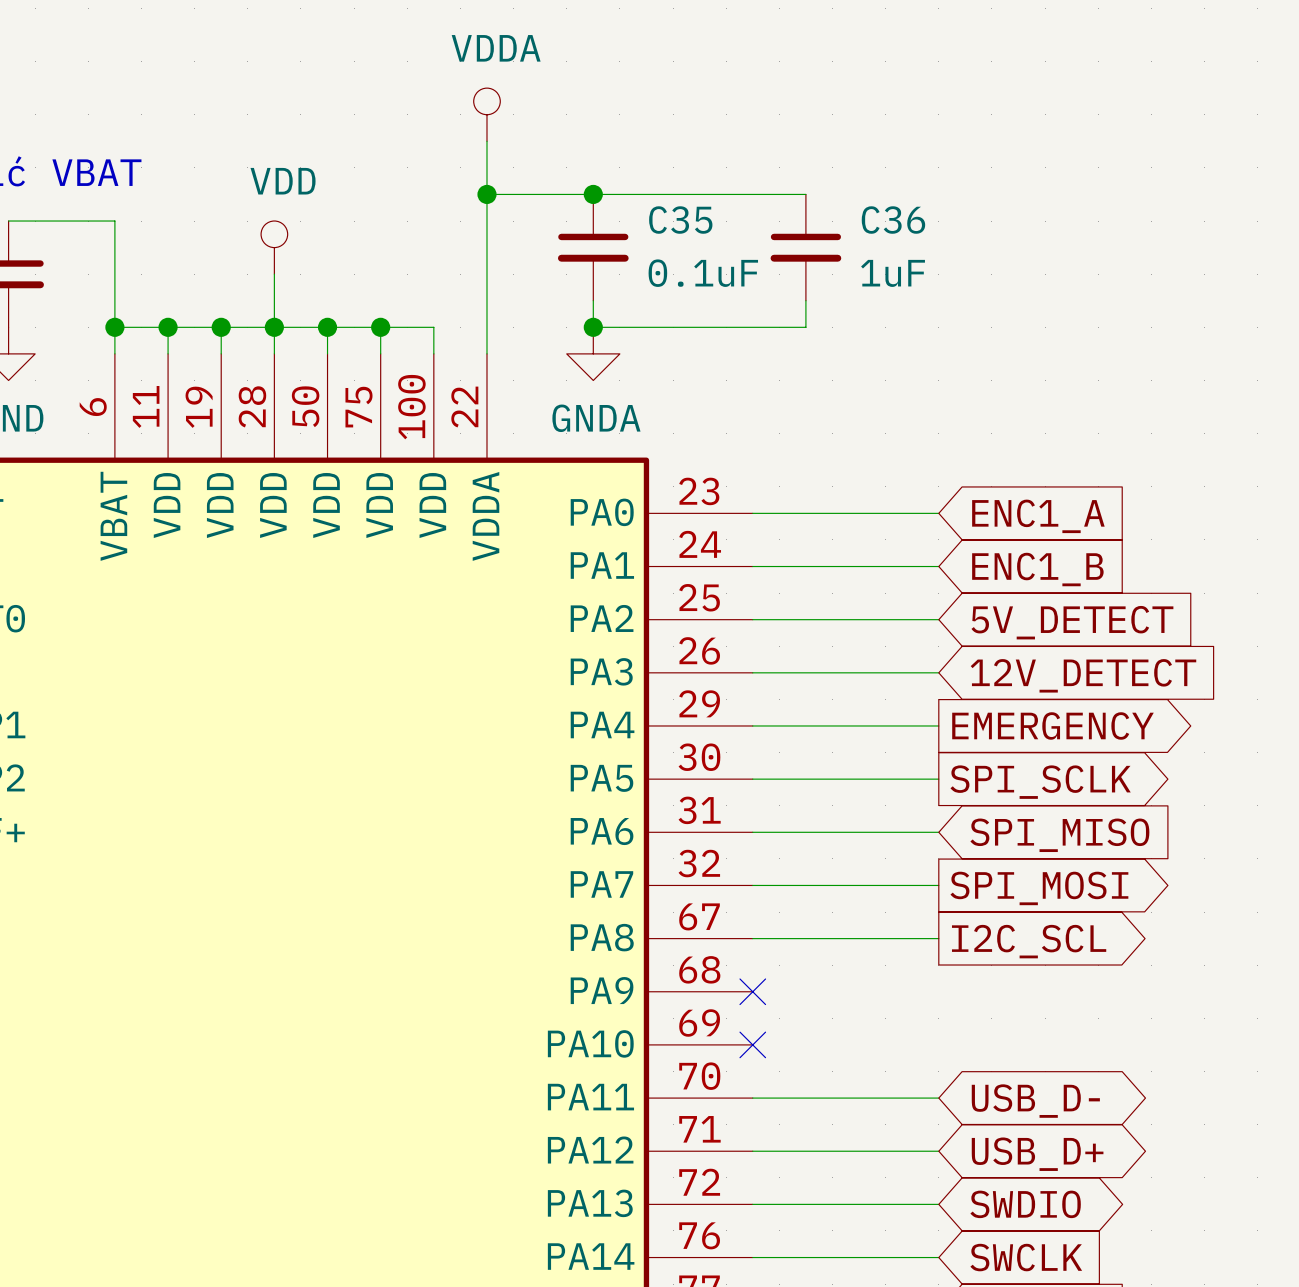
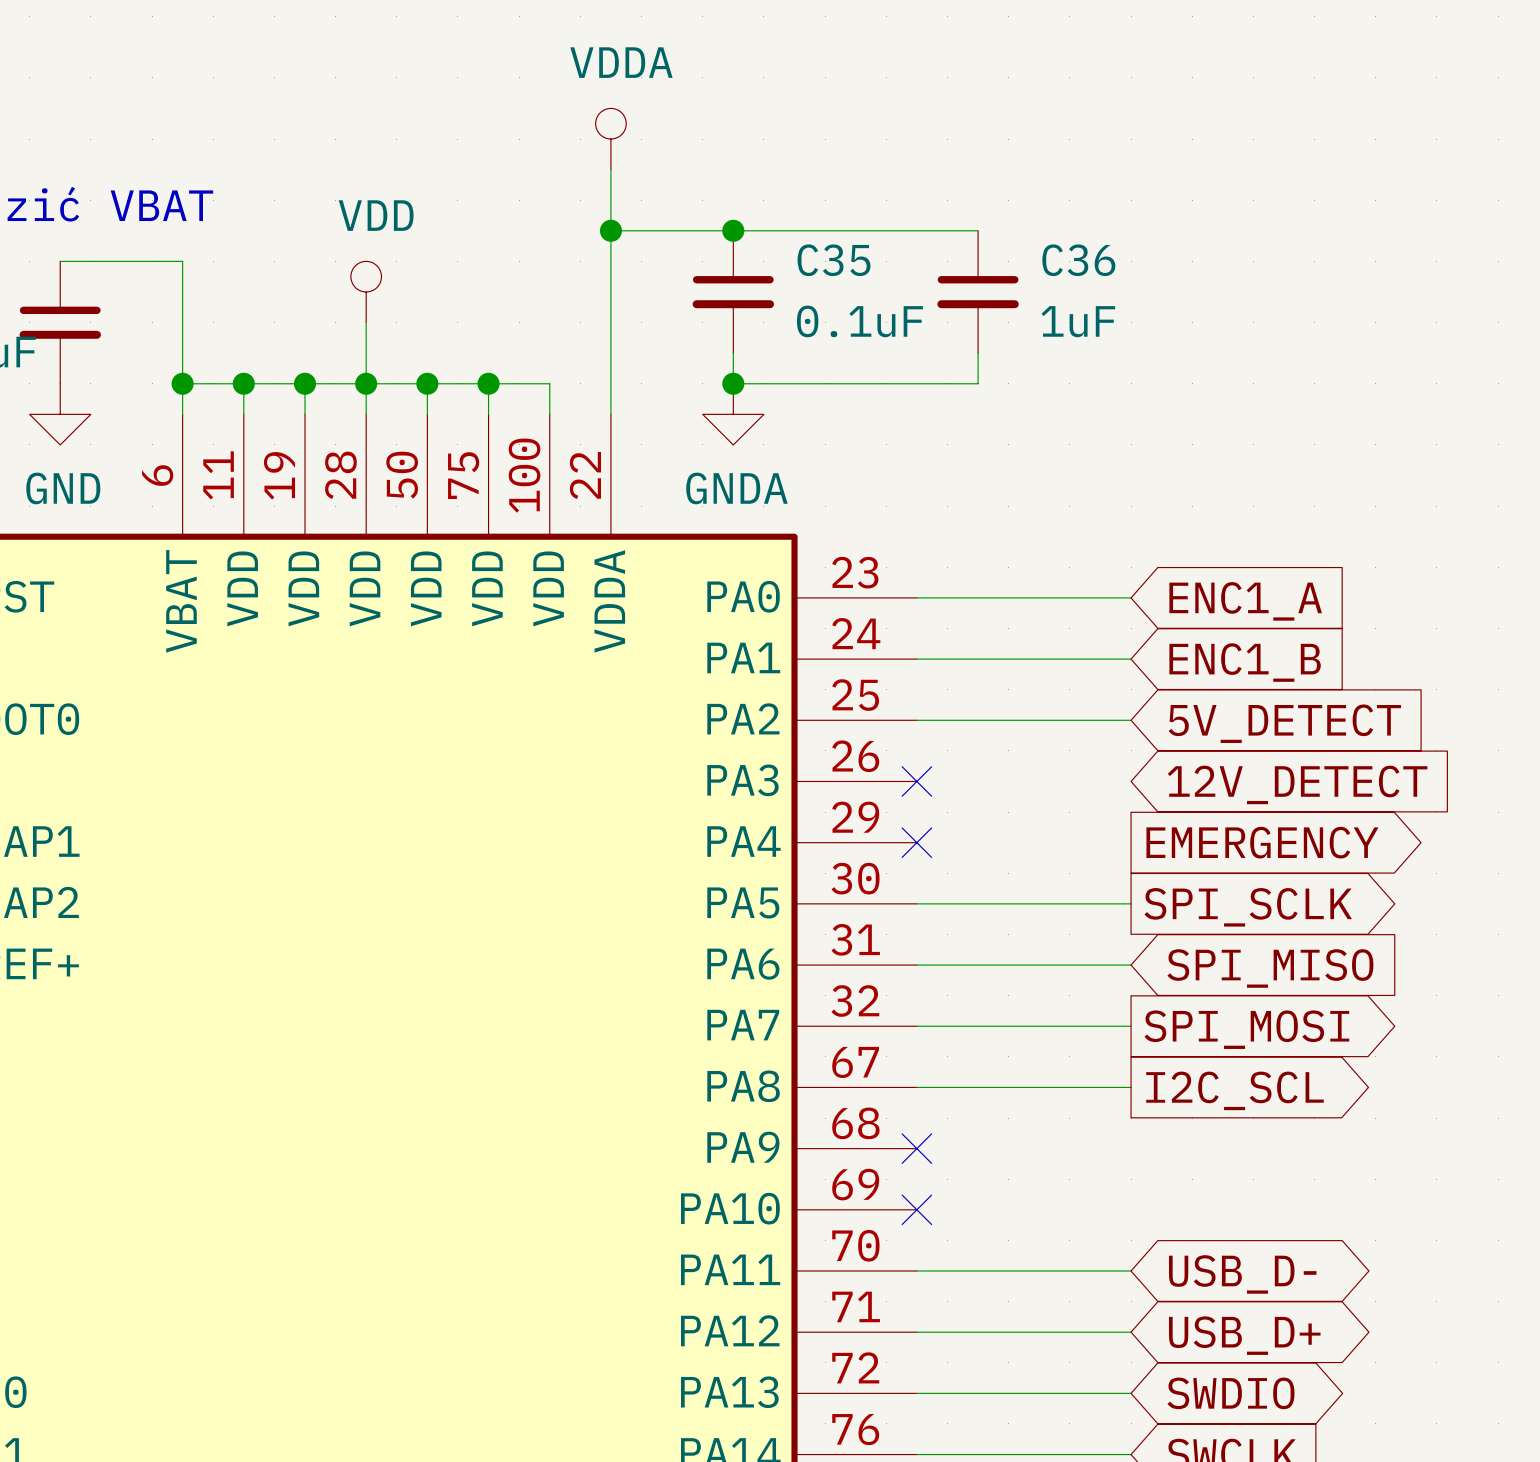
wire: (752, 672) (938, 672) -> none
no-connect mark: none -> (916, 781)
wire: (752, 725) (938, 725) -> none
no-connect mark: none -> (916, 842)

